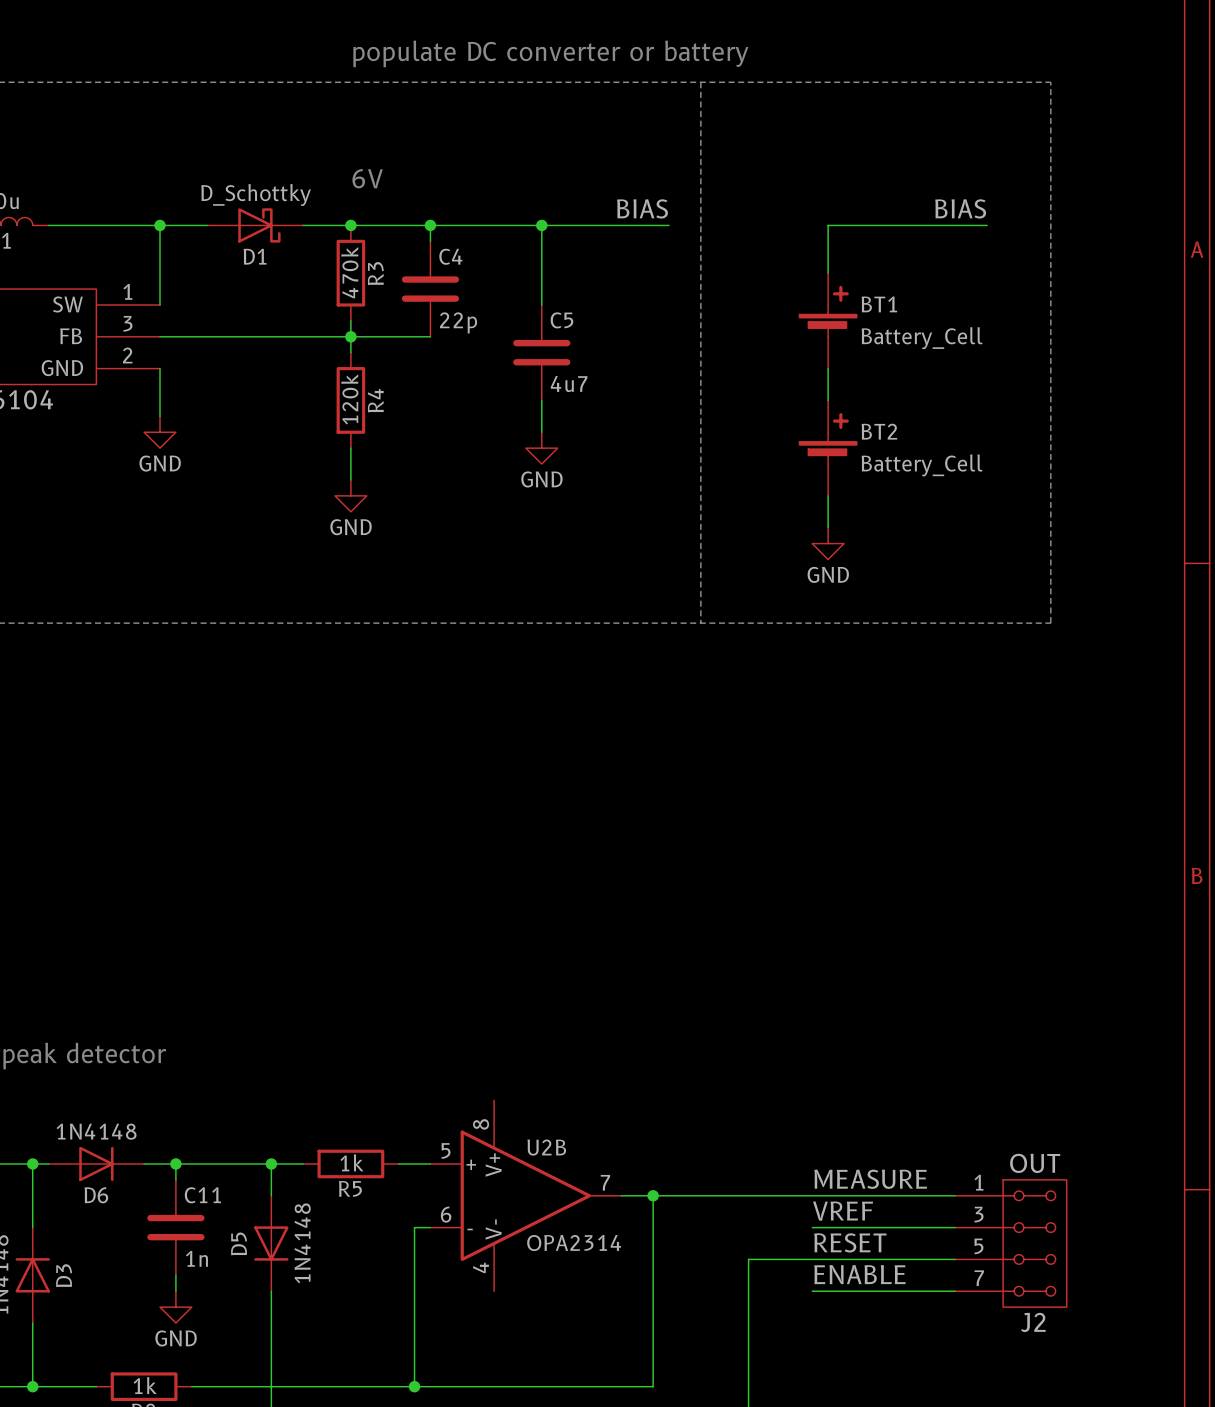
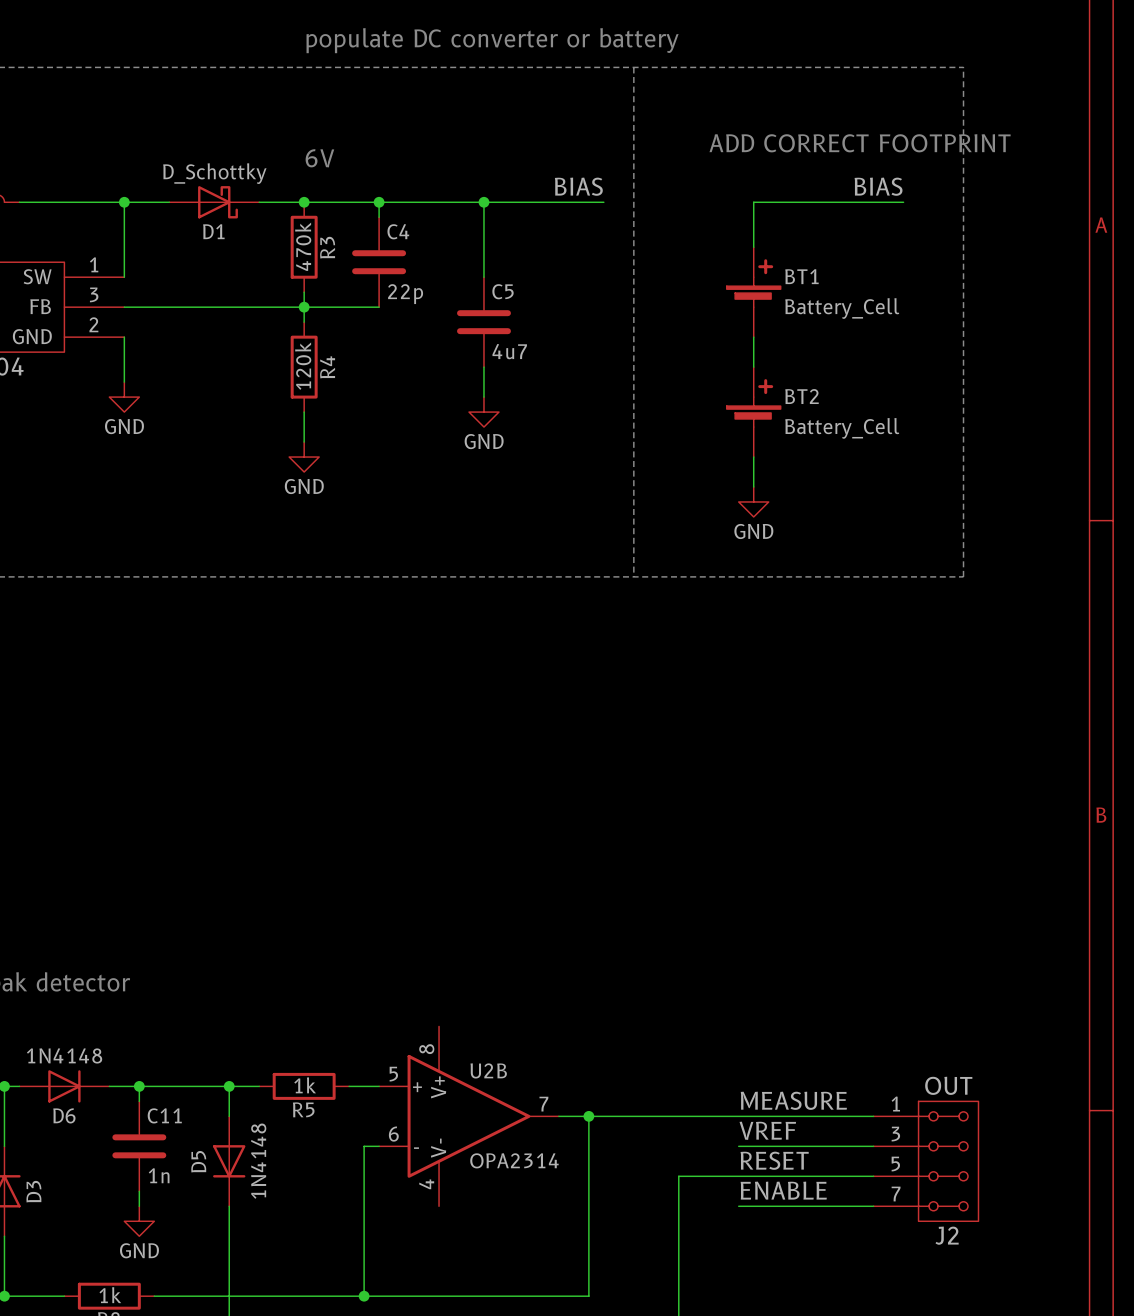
text: none -> ADD CORRECT FOOTPRINT (860, 143)

